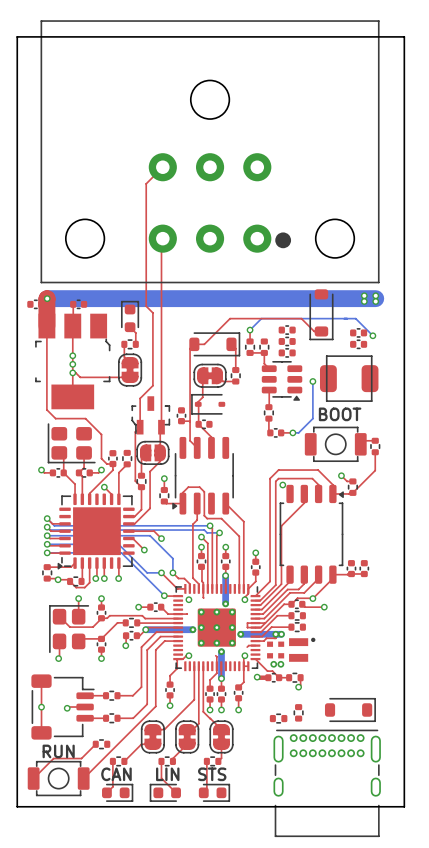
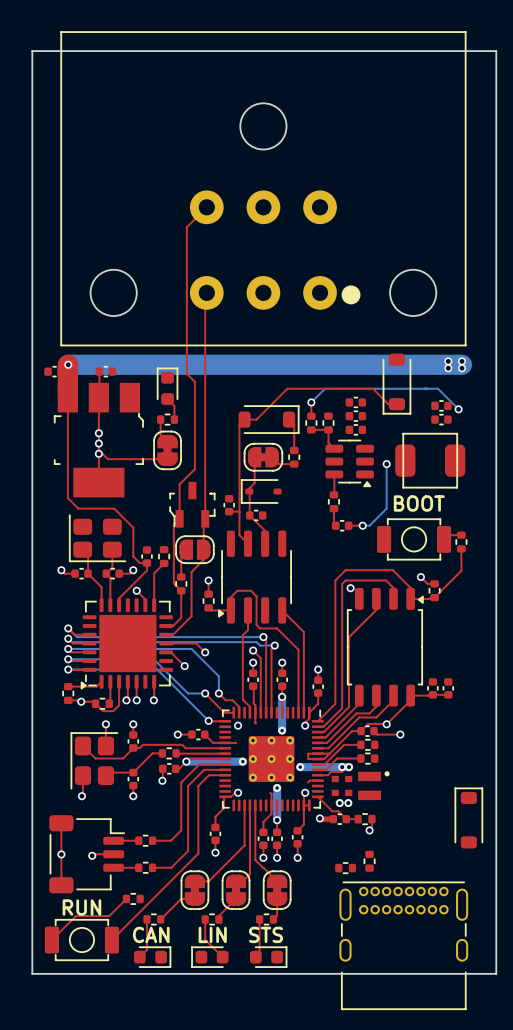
part rotation: 0° (350, 709) -> 90° counterclockwise (468, 818)
part position: (350, 709) -> (468, 818)

